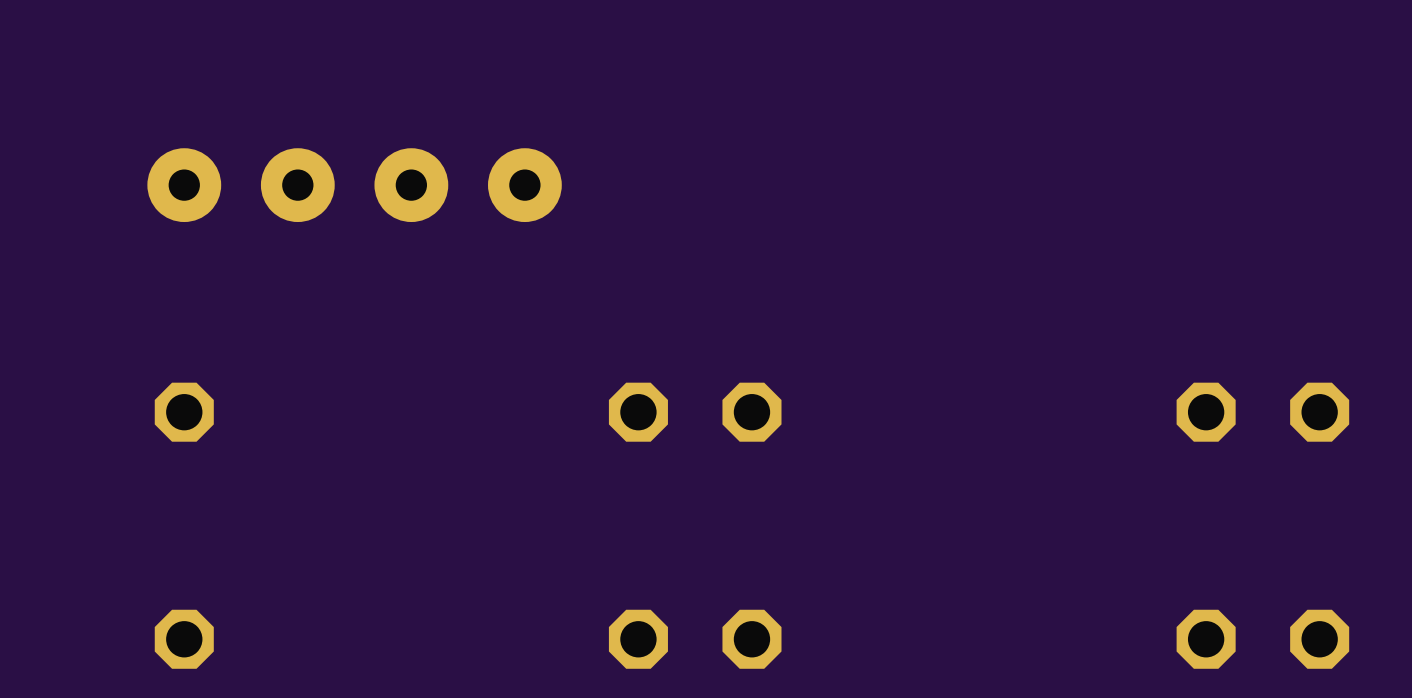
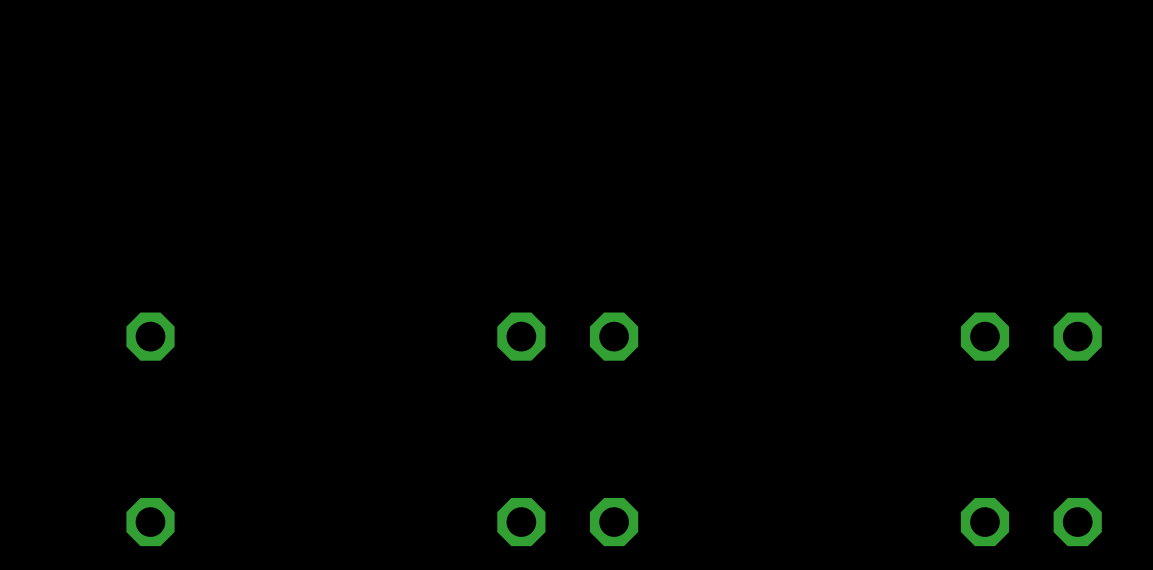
part: (241, 185) -> none
part: (468, 185) -> none

